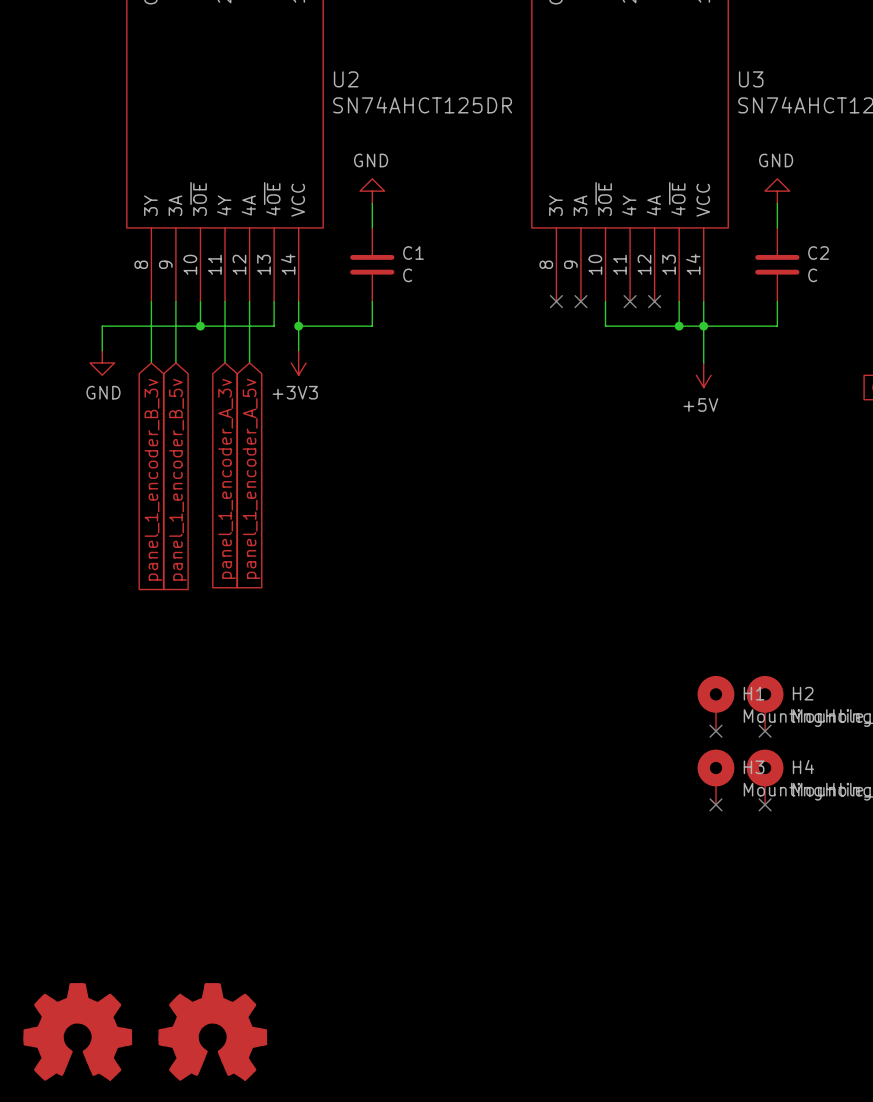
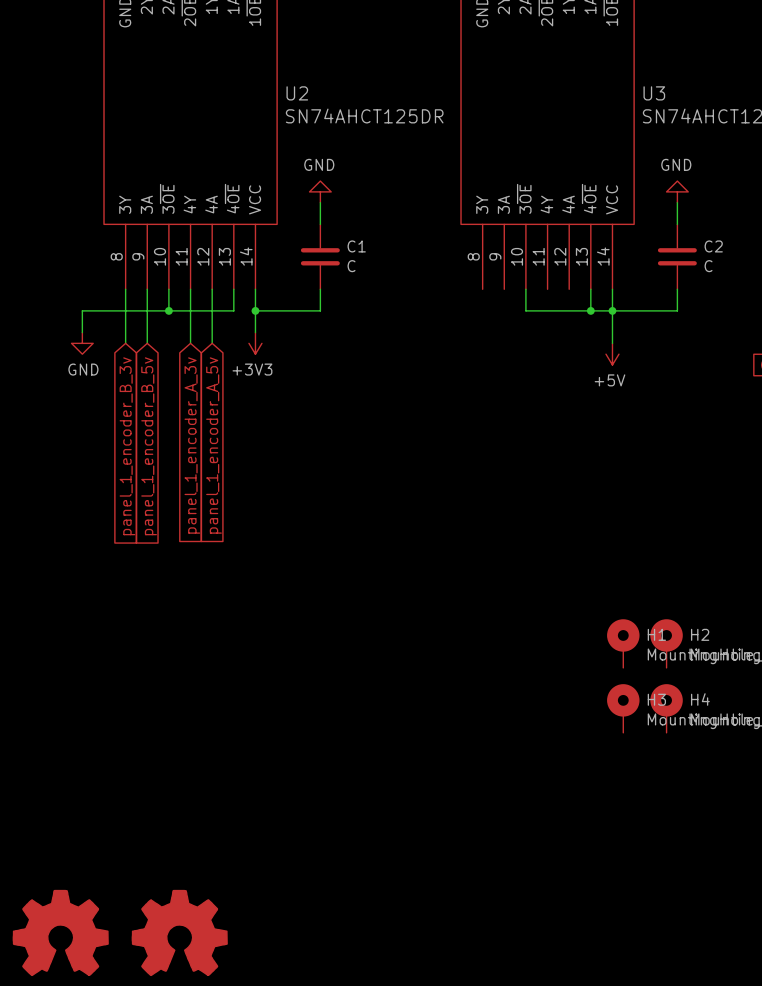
no-connect mark: (556, 301) -> none
no-connect mark: (580, 301) -> none
no-connect mark: (630, 301) -> none
no-connect mark: (654, 301) -> none
no-connect mark: (715, 731) -> none
no-connect mark: (765, 731) -> none
no-connect mark: (715, 804) -> none
no-connect mark: (765, 804) -> none

